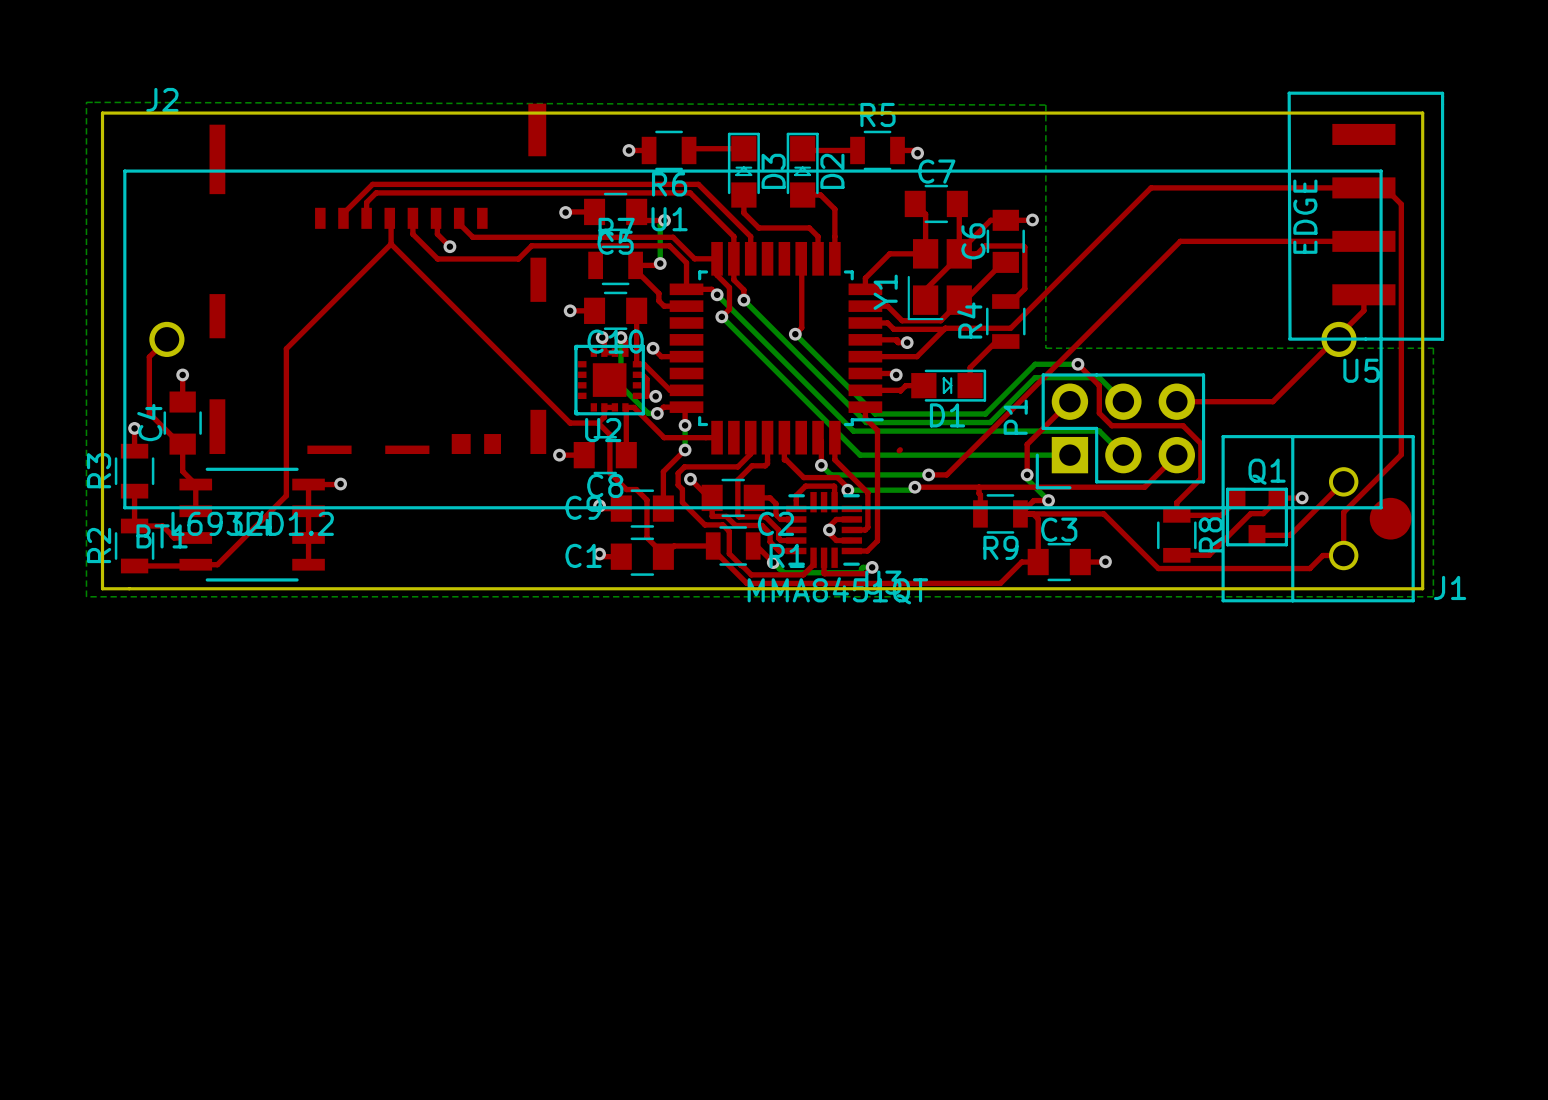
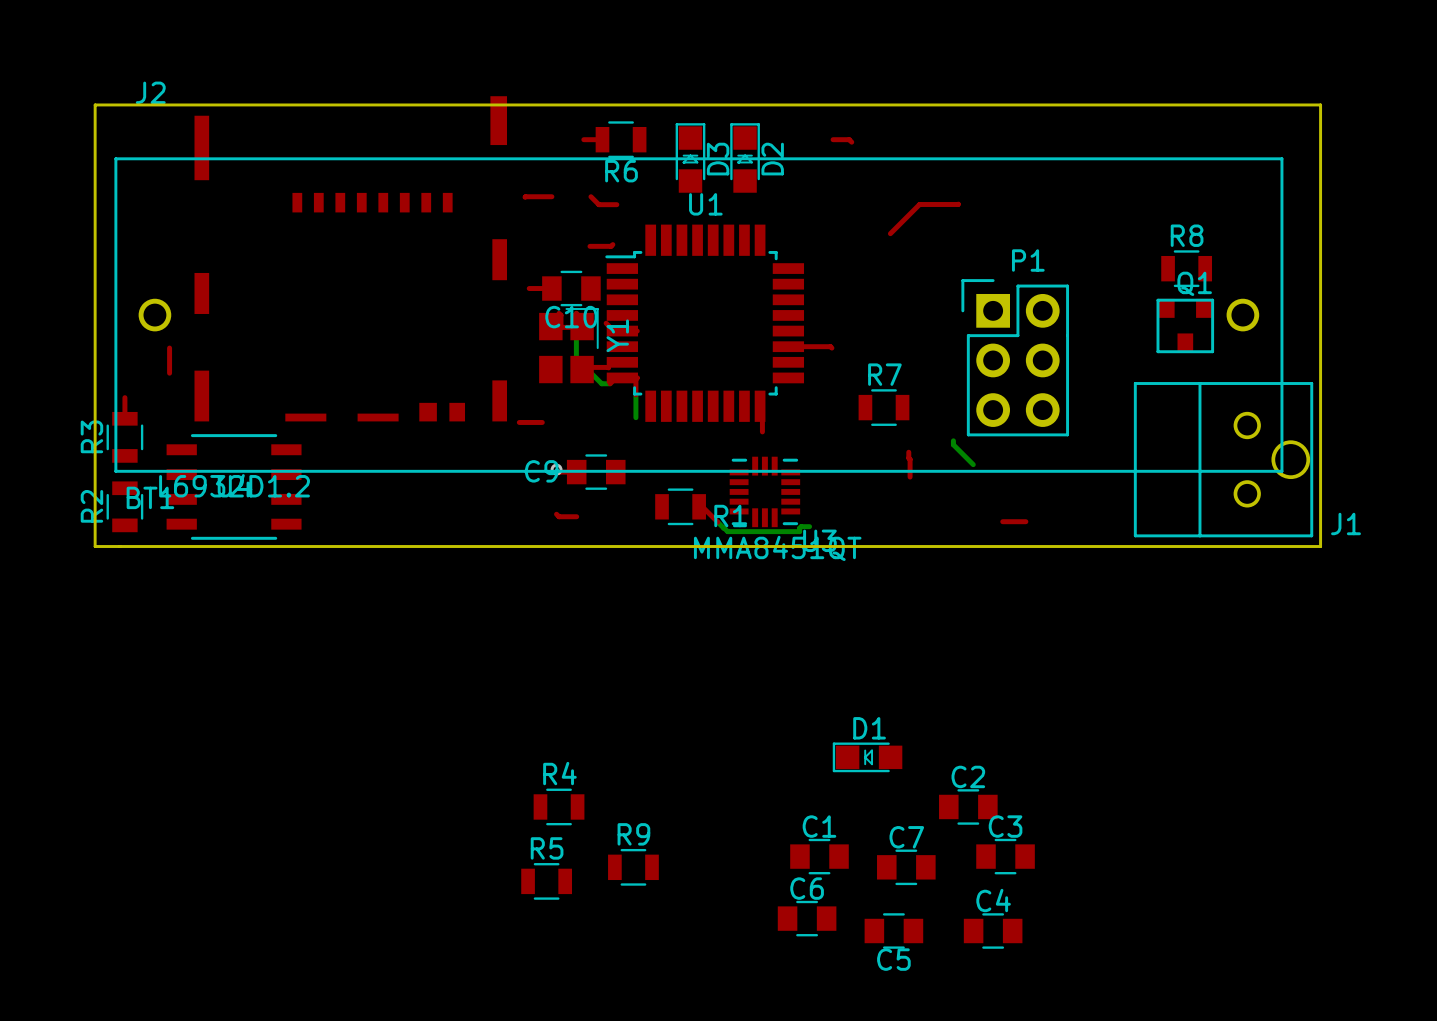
bottom zone outline: (86, 102) (86, 596) (1433, 596) (1433, 348) (1045, 348) (1045, 105) (86, 102) -> none
top track: (743, 148) (690, 148) (689, 150) -> none
top track: (802, 148) (804, 150) (857, 150) -> none
via: (628, 150) -> none
R5 position: (877, 150) -> (546, 881)
via: (917, 153) -> none
top track: (743, 195) (743, 212) (758, 227) (809, 227) (818, 236) (818, 258) -> none
top track: (802, 195) (820, 195) (834, 209) (834, 258) -> none
top track: (915, 203) (925, 214) (925, 253) (889, 253) (865, 278) (865, 289) -> none
C7 position: (936, 203) -> (906, 867)
top track: (957, 203) (959, 205) (959, 255) (925, 289) (925, 300) -> none
C5 position: (615, 211) -> (893, 931)
via: (565, 212) -> none
U5: (1365, 216) -> none
top track: (391, 217) (391, 244) -> none
top track: (437, 217) (437, 234) (449, 246) -> none
top track: (343, 218) (343, 213) (372, 184) (698, 184) (750, 236) (750, 258) -> none
top track: (366, 218) (366, 202) (376, 192) (690, 192) (733, 236) (733, 279) (743, 289) (743, 300) -> none
top track: (412, 218) (412, 234) (437, 258) (518, 258) (531, 245) (669, 245) (686, 262) (686, 289) (711, 289) (717, 294) -> none
top track: (459, 218) (459, 223) (472, 237) (673, 237) (694, 258) (717, 258) (717, 275) (729, 287) (729, 309) (721, 316) -> none
U1 name position: U1 (669, 219) -> U1 (705, 204)
via: (1032, 219) -> none
bottom track: (664, 220) (660, 224) (660, 263) -> none
via: (664, 220) -> none
C6 rotation: 0° (1005, 241) -> 90° clockwise (807, 918)
C6 position: (1005, 241) -> (807, 918)
top track: (1363, 241) (1180, 241) (946, 474) (928, 474) -> none
top track: (391, 244) (570, 423) (598, 423) -> none
top track: (391, 244) (286, 348) (286, 495) (217, 564) (134, 565) -> none
via: (449, 246) -> none
top track: (959, 253) (977, 253) (985, 245) (1024, 247) (1024, 288) (1012, 301) (1005, 301) -> none
top track: (801, 258) (801, 327) (795, 334) -> none
top track: (1005, 262) (1003, 262) (965, 300) (959, 300) (940, 320) (902, 320) (887, 306) (865, 306) -> none
via: (660, 263) -> none
top track: (636, 264) (635, 270) (658, 293) (658, 300) (664, 306) (686, 306) -> none
R7 position: (615, 265) -> (883, 407)
Y1 rotation: 0° (939, 279) -> 180° (568, 345)
Y1 position: (939, 279) -> (568, 345)
bottom track: (717, 294) (853, 431) (1099, 431) (1123, 455) -> none
via: (717, 294) -> none
top track: (1363, 294) (1363, 310) (1272, 401) (1176, 401) -> none
bottom track: (743, 300) (866, 422) (990, 422) (1035, 377) (1099, 377) (1123, 401) -> none
via: (743, 300) -> none
via: (570, 310) -> none
top track: (636, 310) (636, 363) (644, 364) (670, 390) (686, 390) -> none
bottom track: (721, 316) (860, 455) (1069, 455) -> none
via: (721, 316) -> none
R4 rotation: 0° (1005, 321) -> 90° clockwise (559, 806)
R4 position: (1005, 321) -> (559, 806)
top track: (865, 322) (887, 322) (893, 329) (944, 329) -> none
bottom track: (795, 334) (875, 413) (985, 413) (1035, 364) (1077, 364) -> none
via: (795, 334) -> none
via: (602, 337) -> none
via: (620, 337) -> none
top track: (166, 339) (149, 356) (149, 413) (180, 444) (182, 444) (182, 471) (195, 484) (195, 511) -> none
top track: (865, 339) (897, 339) (898, 342) (907, 342) -> none
top track: (1005, 341) (996, 341) (970, 367) (970, 385) -> none
via: (907, 342) -> none
via: (653, 348) -> none
U1 rotation: 0° (776, 348) -> 180° (704, 323)
top track: (865, 356) (916, 356) (945, 328) (1010, 328) (1151, 187) (1384, 187) (1401, 204) (1401, 454) (1343, 512) (1343, 555) (1322, 555) (1309, 568) (1158, 568) (1103, 513) (1020, 513) (1033, 500) (1048, 500) -> none
top track: (1077, 364) (1099, 385) (1099, 413) (1111, 425) (1183, 425) (1200, 443) (1200, 478) (1176, 502) (1176, 515) (1221, 515) (1237, 498) -> none
via: (1077, 364) -> none
via: (182, 374) -> none
top track: (636, 374) (642, 374) (647, 379) (646, 395) -> none
via: (896, 374) -> none
U2: (609, 380) -> none
top track: (923, 385) (905, 385) (900, 391) (865, 390) -> none
D1 rotation: 0° (948, 385) -> 180° (867, 757)
D1 position: (948, 385) -> (867, 757)
via: (655, 396) -> none
top track: (1069, 401) (1027, 444) (1027, 474) -> none
top track: (614, 407) (604, 407) (604, 416) (598, 423) -> none
top track: (865, 407) (865, 418) (877, 430) (877, 540) (867, 551) (851, 551) -> none
via: (657, 413) -> none
C4 rotation: 0° (182, 423) -> 90° clockwise (993, 931)
C4 position: (182, 423) -> (993, 931)
top track: (598, 423) (609, 434) (609, 473) (626, 489) (636, 489) (646, 500) (646, 537) (663, 554) (663, 556) (674, 546) (713, 546) (713, 549) (746, 583) (1000, 583) (1021, 562) (1038, 562) (1038, 518) (1033, 513) -> none
via: (685, 425) -> none
via: (134, 428) -> none
P1 rotation: 0° (1120, 431) -> 90° clockwise (1015, 357)
J1 footprint: [1221, 435, 1415, 603] -> [1133, 382, 1314, 538]
top track: (717, 437) (664, 437) (633, 407) (625, 407) (626, 455) -> none
top track: (750, 437) (750, 454) (737, 466) (684, 466) (678, 473) (678, 485) (682, 489) (682, 502) (704, 524) (722, 524) (729, 531) (729, 553) (751, 574) (803, 574) (813, 564) (813, 557) -> none
top track: (767, 437) (767, 463) (765, 465) (752, 465) (737, 480) (737, 515) (765, 516) (778, 529) (778, 538) (780, 540) (796, 540) -> none
top track: (784, 437) (784, 459) (803, 477) (837, 477) (847, 490) -> none
top track: (834, 437) (834, 459) (867, 492) (867, 527) (865, 529) (851, 529) -> none
top track: (685, 449) (663, 471) (663, 508) -> none
via: (685, 449) -> none
top track: (900, 449) (899, 450) -> none
via: (559, 455) -> none
C8: (605, 455) -> none
top track: (1176, 455) (1144, 487) (914, 487) -> none
bottom track: (821, 465) (831, 474) (928, 474) -> none
via: (821, 465) -> none
via: (928, 474) -> none
via: (1027, 474) -> none
top track: (690, 479) (709, 497) (712, 497) (712, 516) (726, 516) (735, 525) (762, 525) (770, 533) (770, 541) (779, 551) (796, 551) -> none
via: (690, 479) -> none
top track: (1343, 481) (1290, 535) (1257, 535) -> none
top track: (340, 484) (308, 484) (308, 564) -> none
via: (340, 484) -> none
bottom track: (914, 487) (911, 490) (847, 490) -> none
via: (914, 487) -> none
via: (847, 490) -> none
top track: (134, 491) (134, 526) (162, 526) (174, 537) (195, 537) -> none
C2 position: (733, 497) -> (968, 806)
top track: (754, 497) (770, 497) (775, 503) (775, 514) (780, 519) (796, 519) -> none
via: (1302, 497) -> none
top track: (1301, 498) (1276, 498) (1263, 513) (1250, 513) (1209, 555) (1176, 555) -> none
via: (1048, 500) -> none
top track: (834, 502) (834, 486) (805, 486) (796, 495) (796, 508) -> none
R9 position: (1000, 513) -> (633, 867)
Q1 position: (1256, 517) -> (1185, 325)
top track: (851, 519) (836, 519) (829, 526) (829, 533) (836, 540) (851, 540) -> none
C2 name position: C2 (775, 523) -> C2 (968, 776)
via: (829, 529) -> none
R8 name position: R8 (1210, 534) -> R8 (1187, 235)
R8 rotation: 0° (1176, 535) -> 90° clockwise (1186, 268)
R8 position: (1176, 535) -> (1186, 268)
R9 name position: R9 (1000, 547) -> R9 (633, 834)
via: (599, 554) -> none
C1 name position: C1 (583, 555) -> C1 (819, 826)
C1 position: (642, 556) -> (819, 856)
top track: (824, 557) (824, 573) (865, 573) (872, 567) -> none
via: (1105, 561) -> none
via: (773, 562) -> none
C3 position: (1059, 562) -> (1005, 856)
via: (872, 567) -> none

